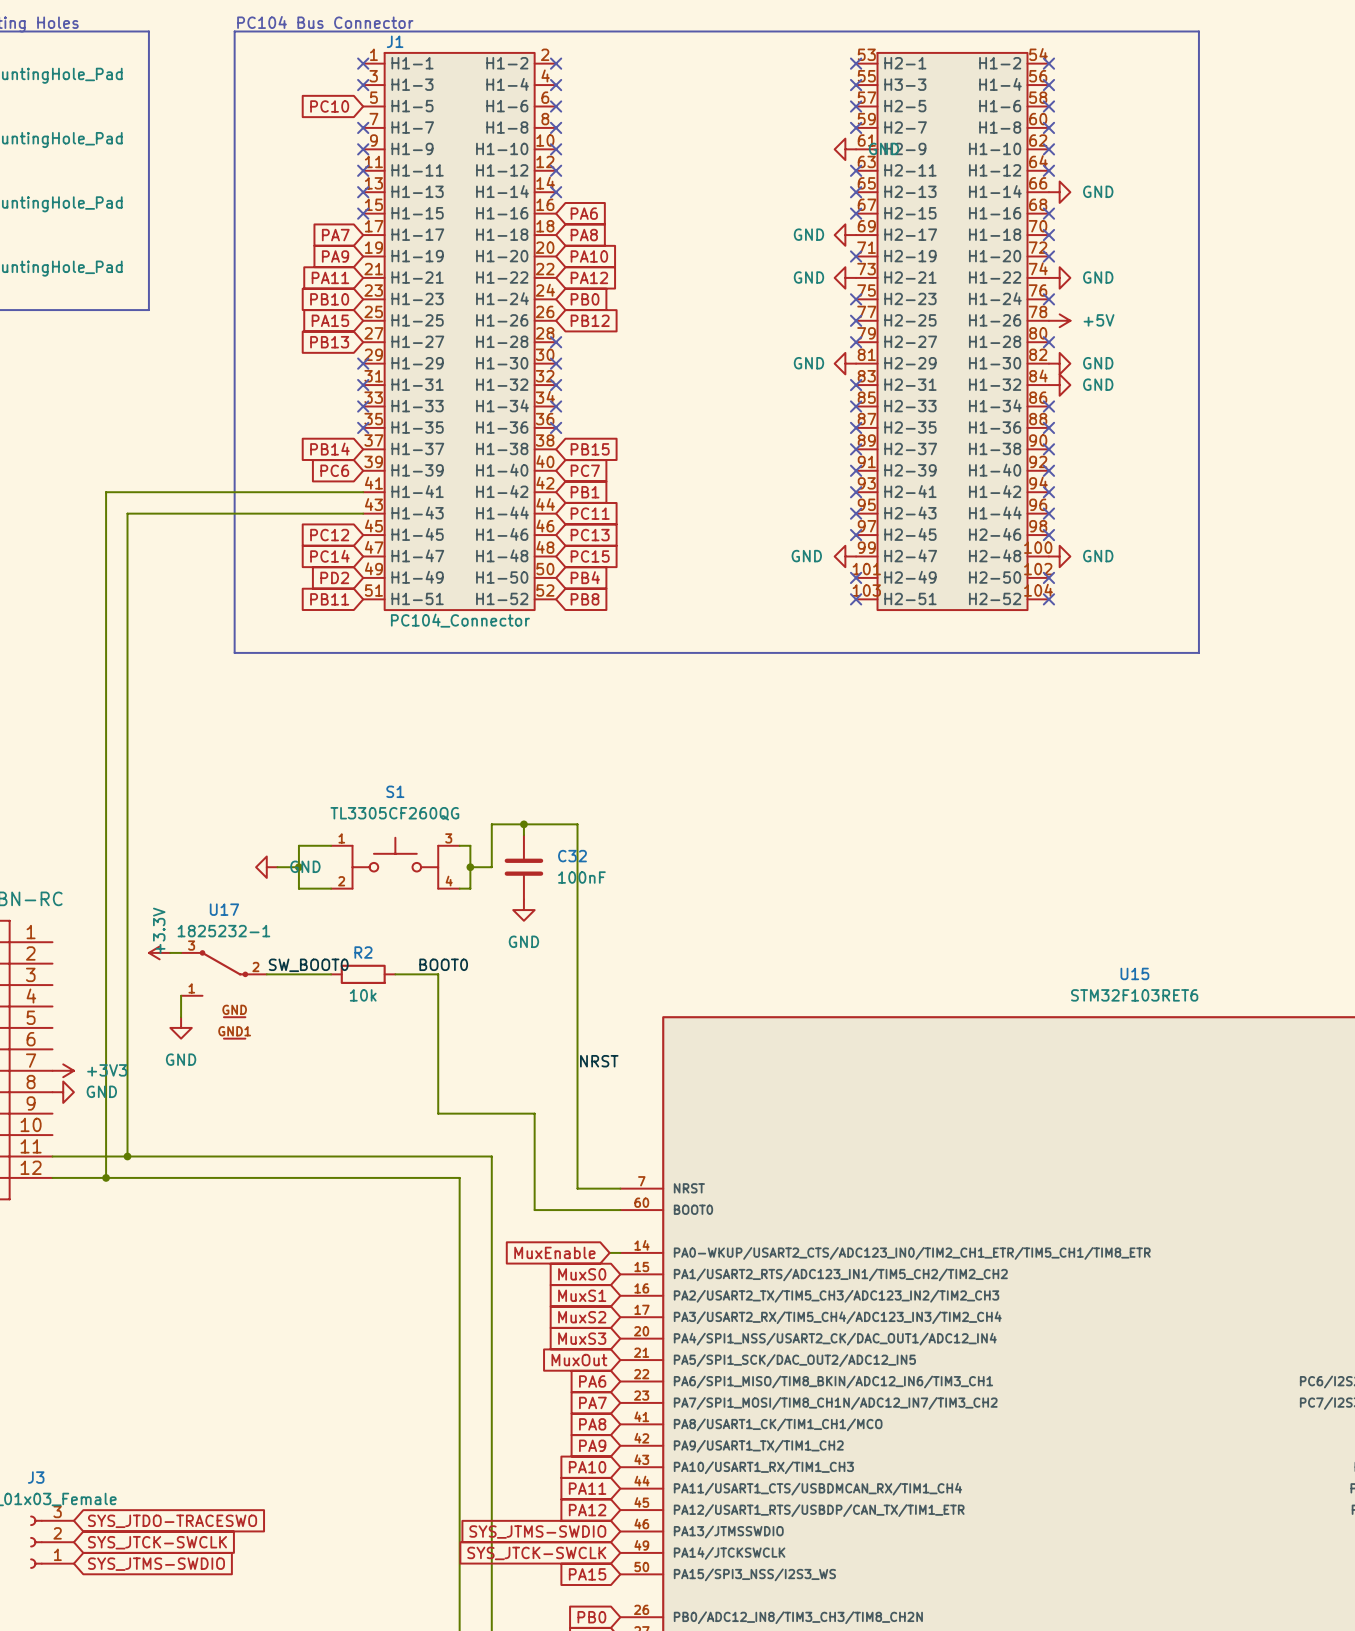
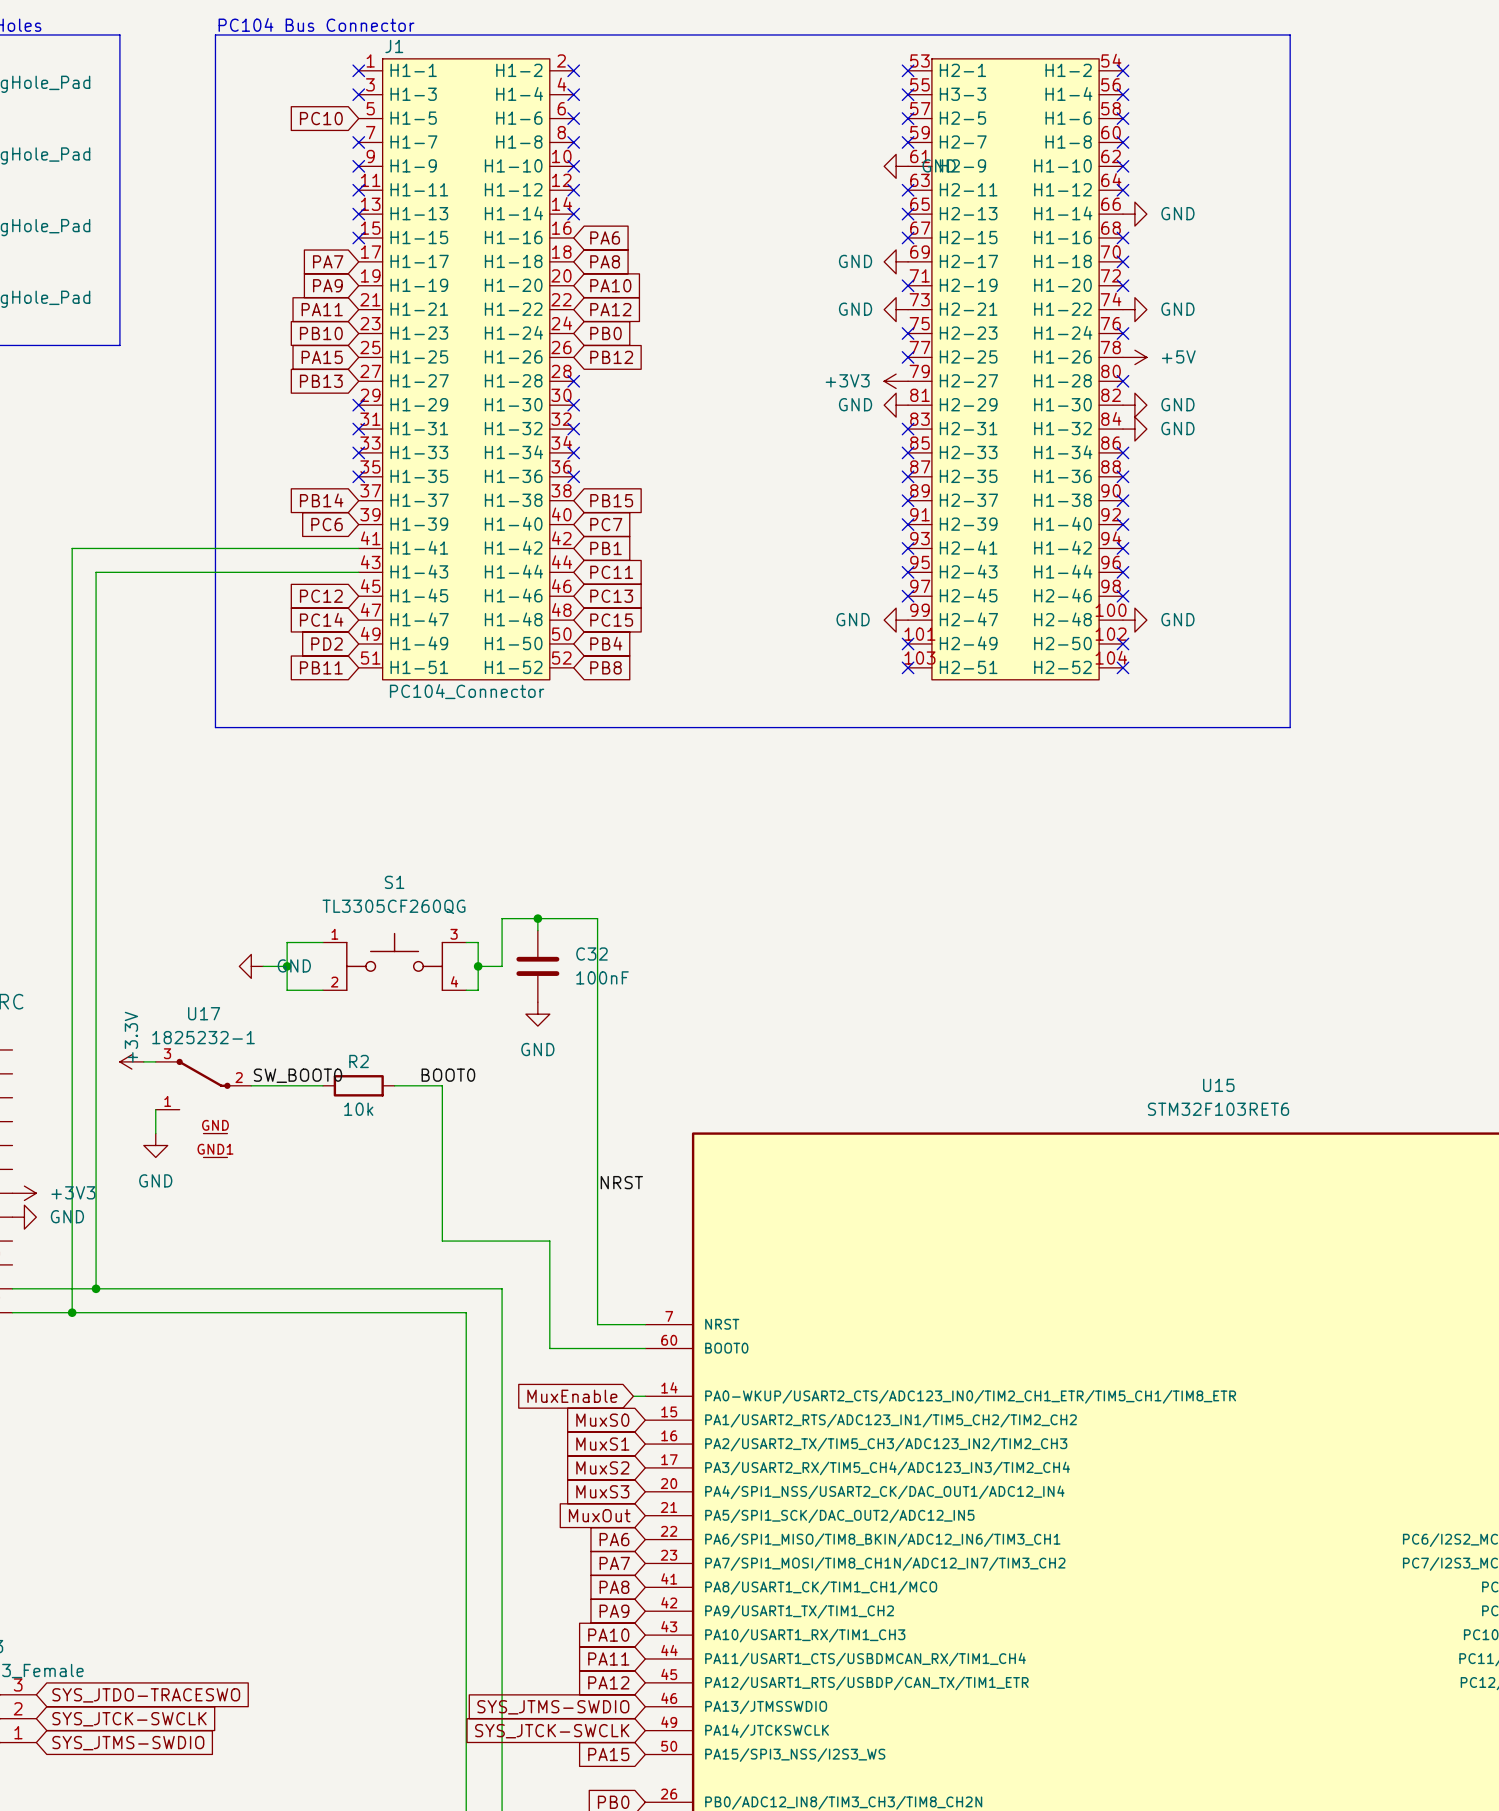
power symbol: none -> +3V3 (896, 381)
no-connect mark: (856, 342) -> none

